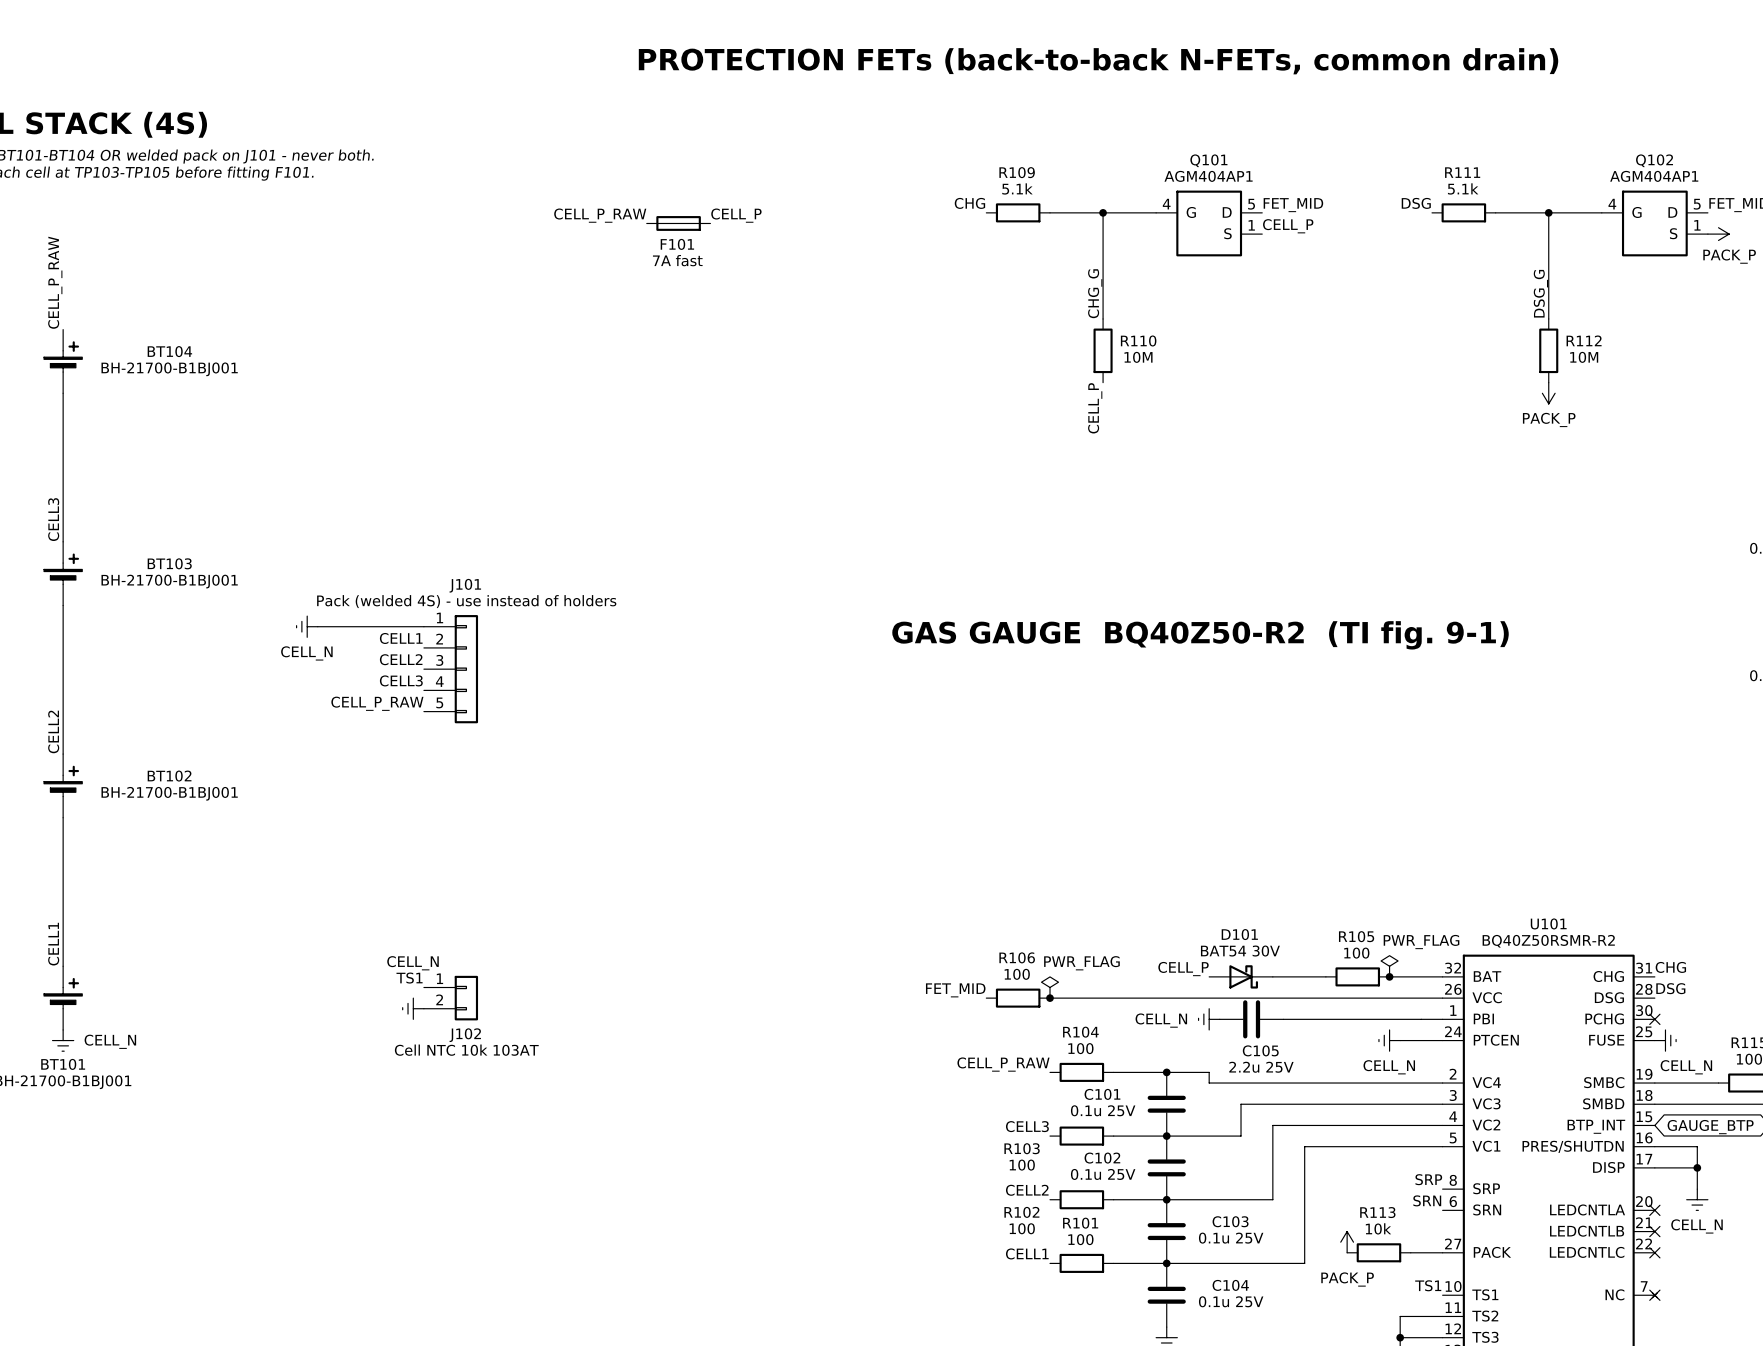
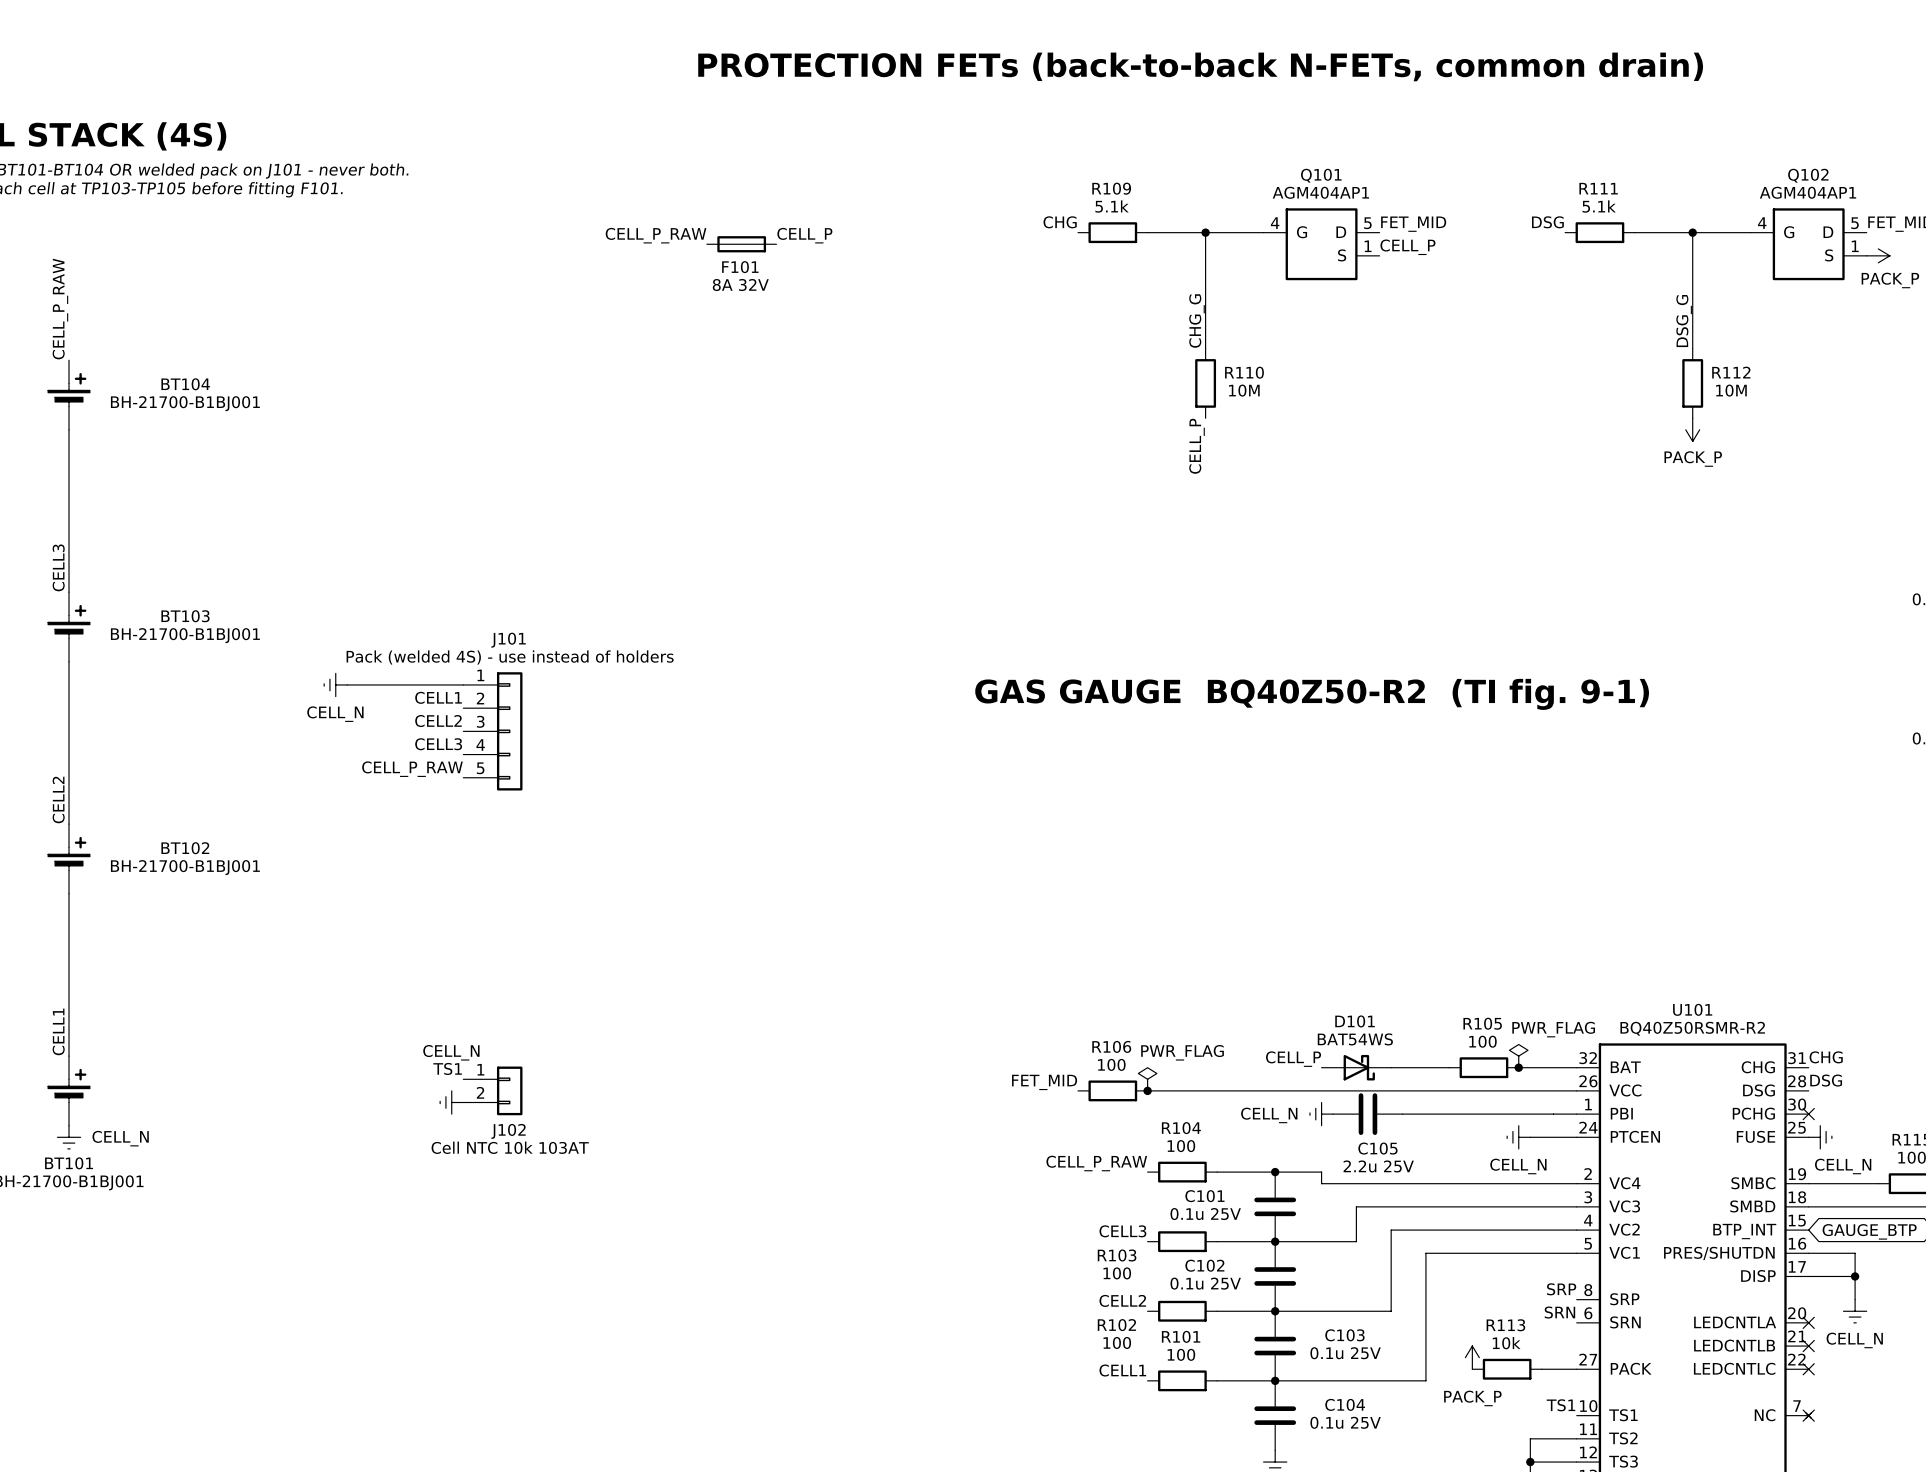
F101 value: 7A fast (677, 260) -> 8A 32V (740, 285)
D101 value: BAT54 30V (1240, 951) -> BAT54WS (1355, 1039)

